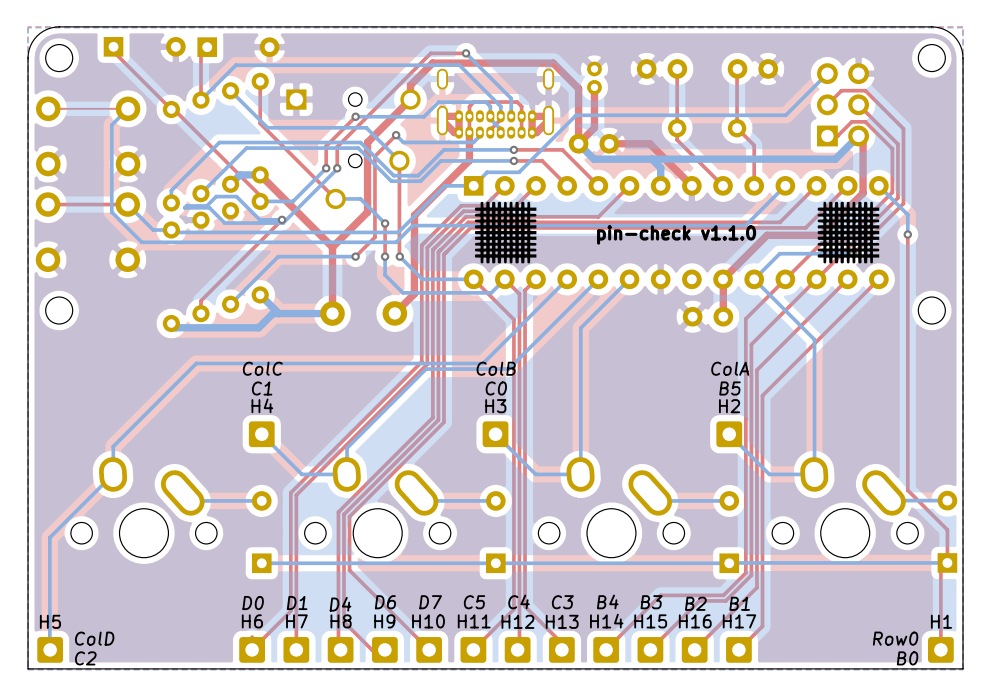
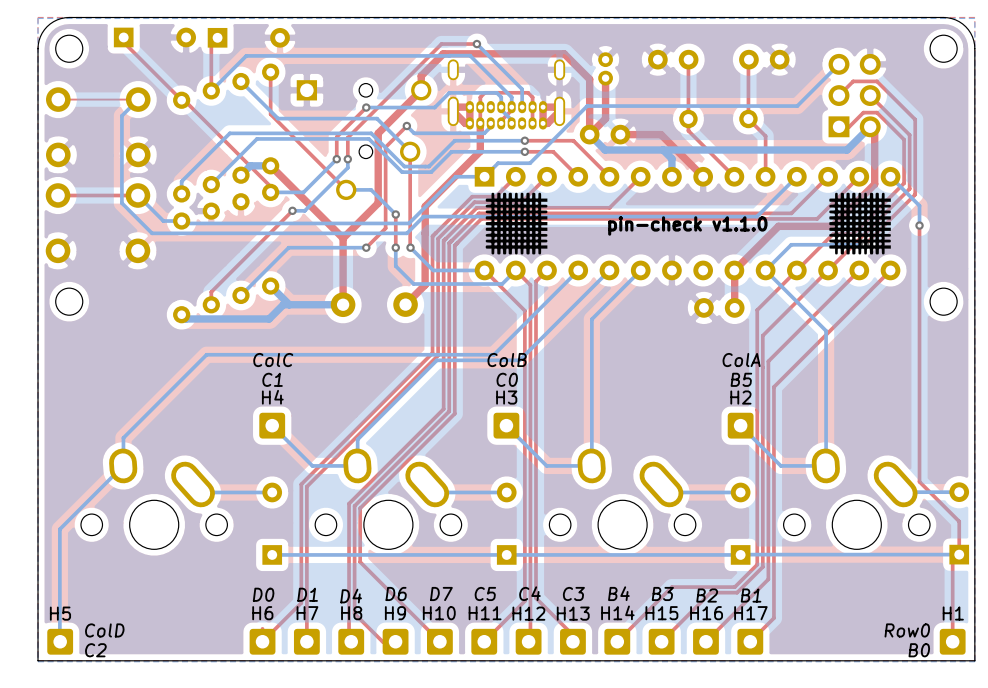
bottom track: (337, 168) (283, 223) (224, 223) (209, 207) (184, 207) (186, 205) (206, 205) (216, 196) (236, 196) (259, 219) (282, 219) -> (347, 159) (347, 167) (304, 210) (292, 210)

